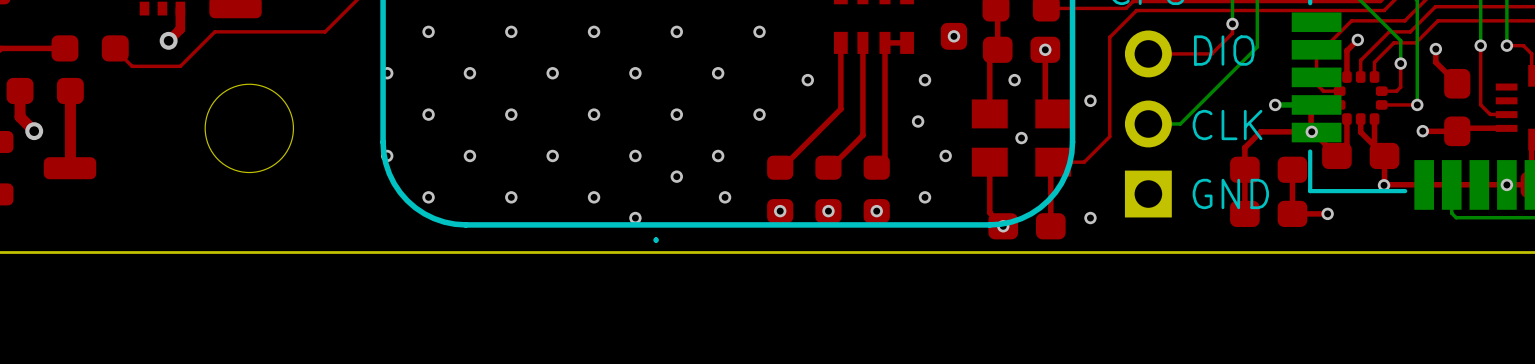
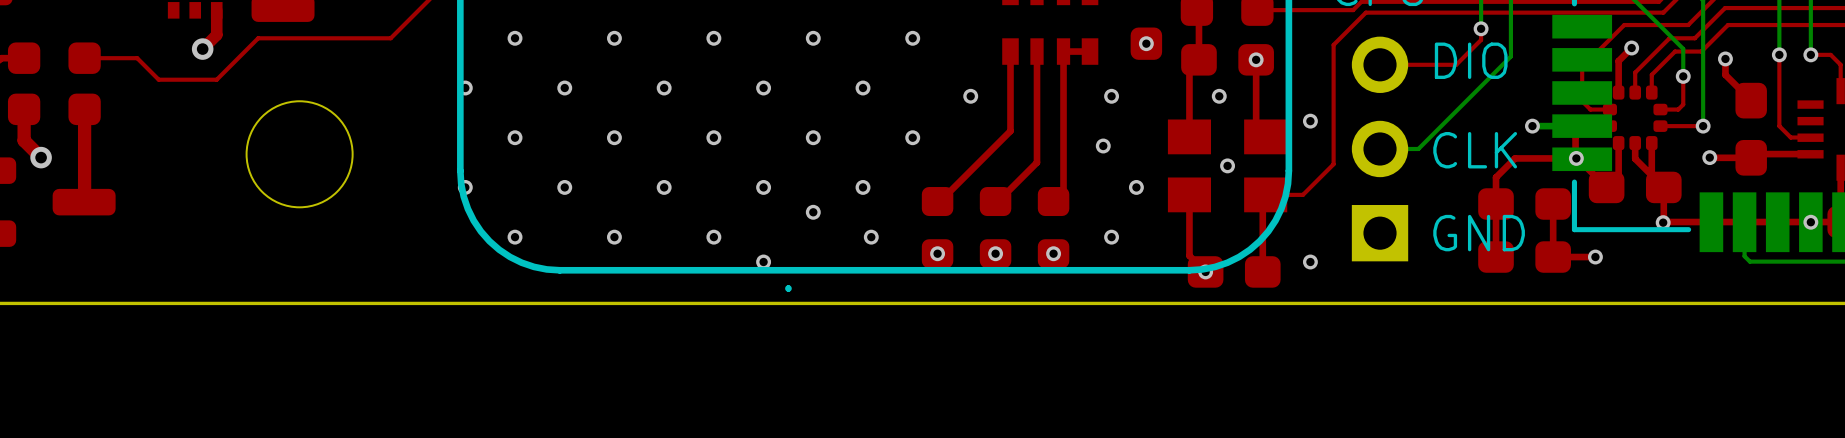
top track: (64, 48) (20, 48) -> none
part position: (90, 48) -> (54, 58)
top track: none -> (137, 58) (84, 58)

